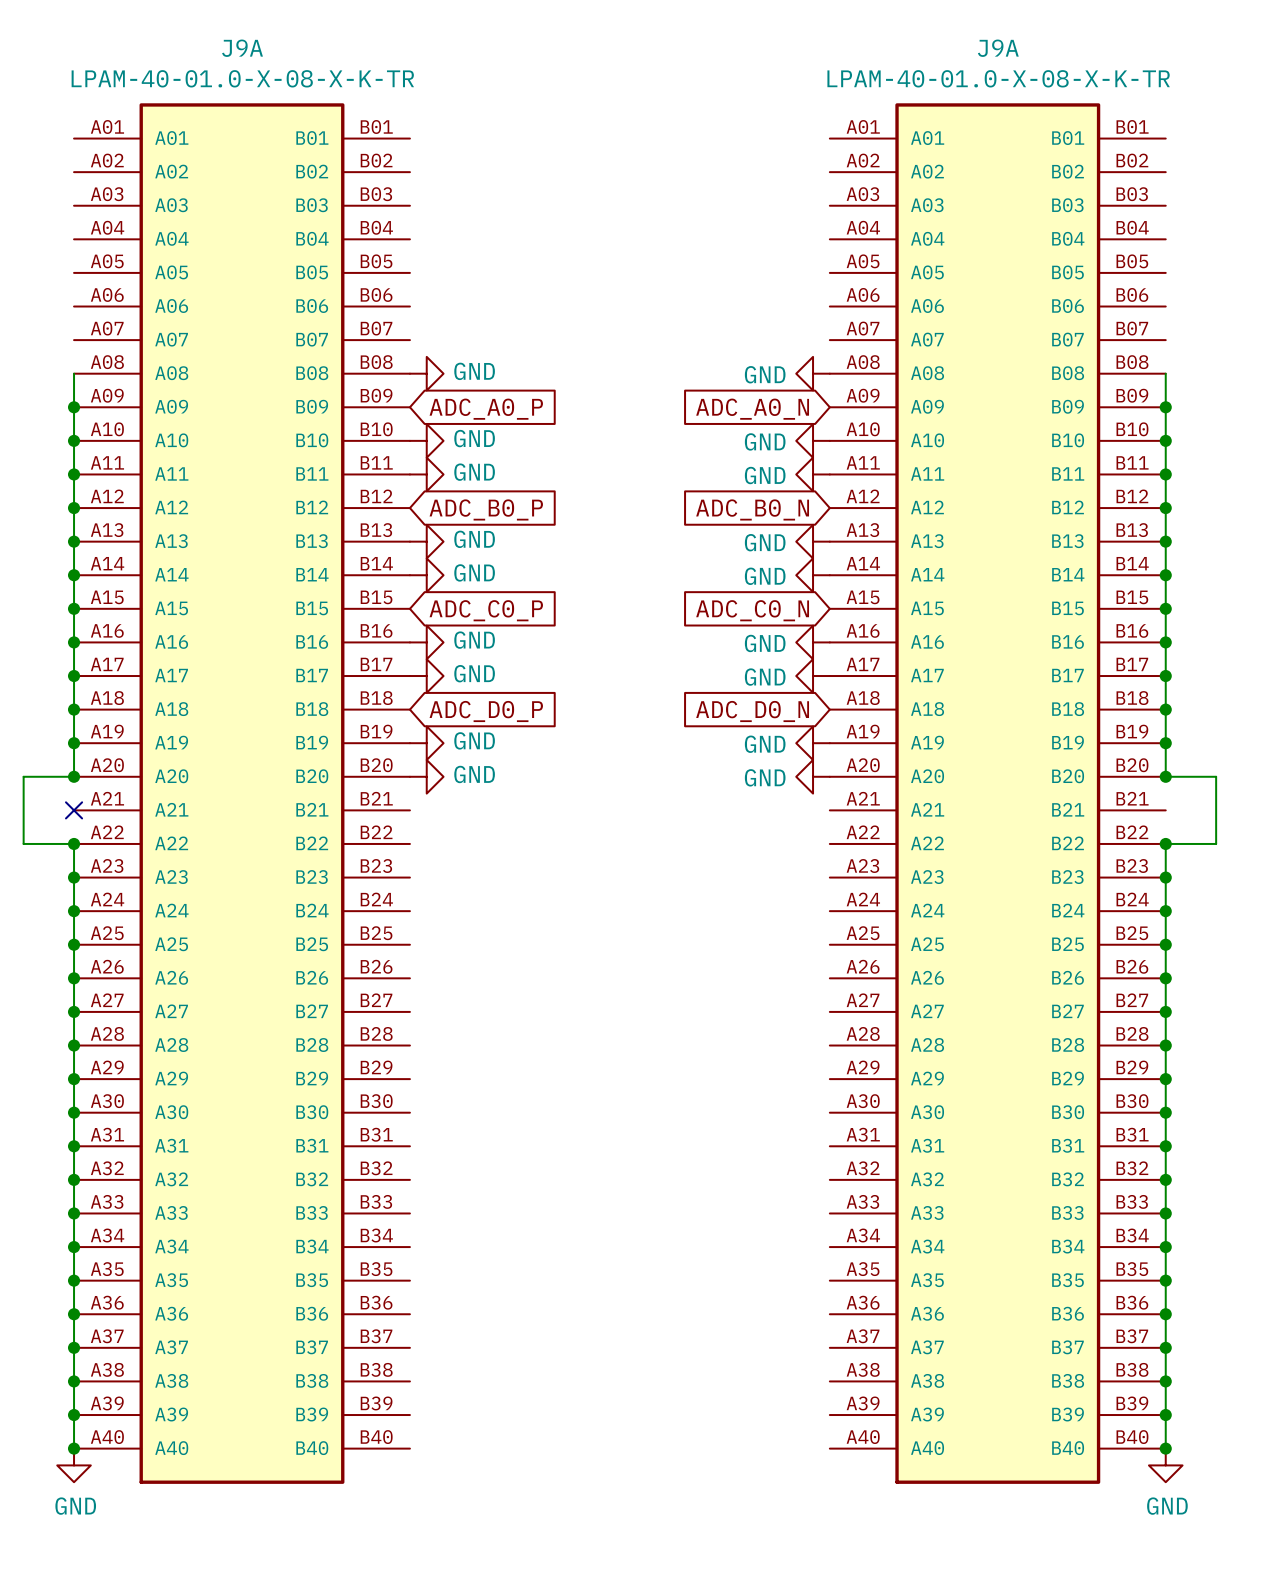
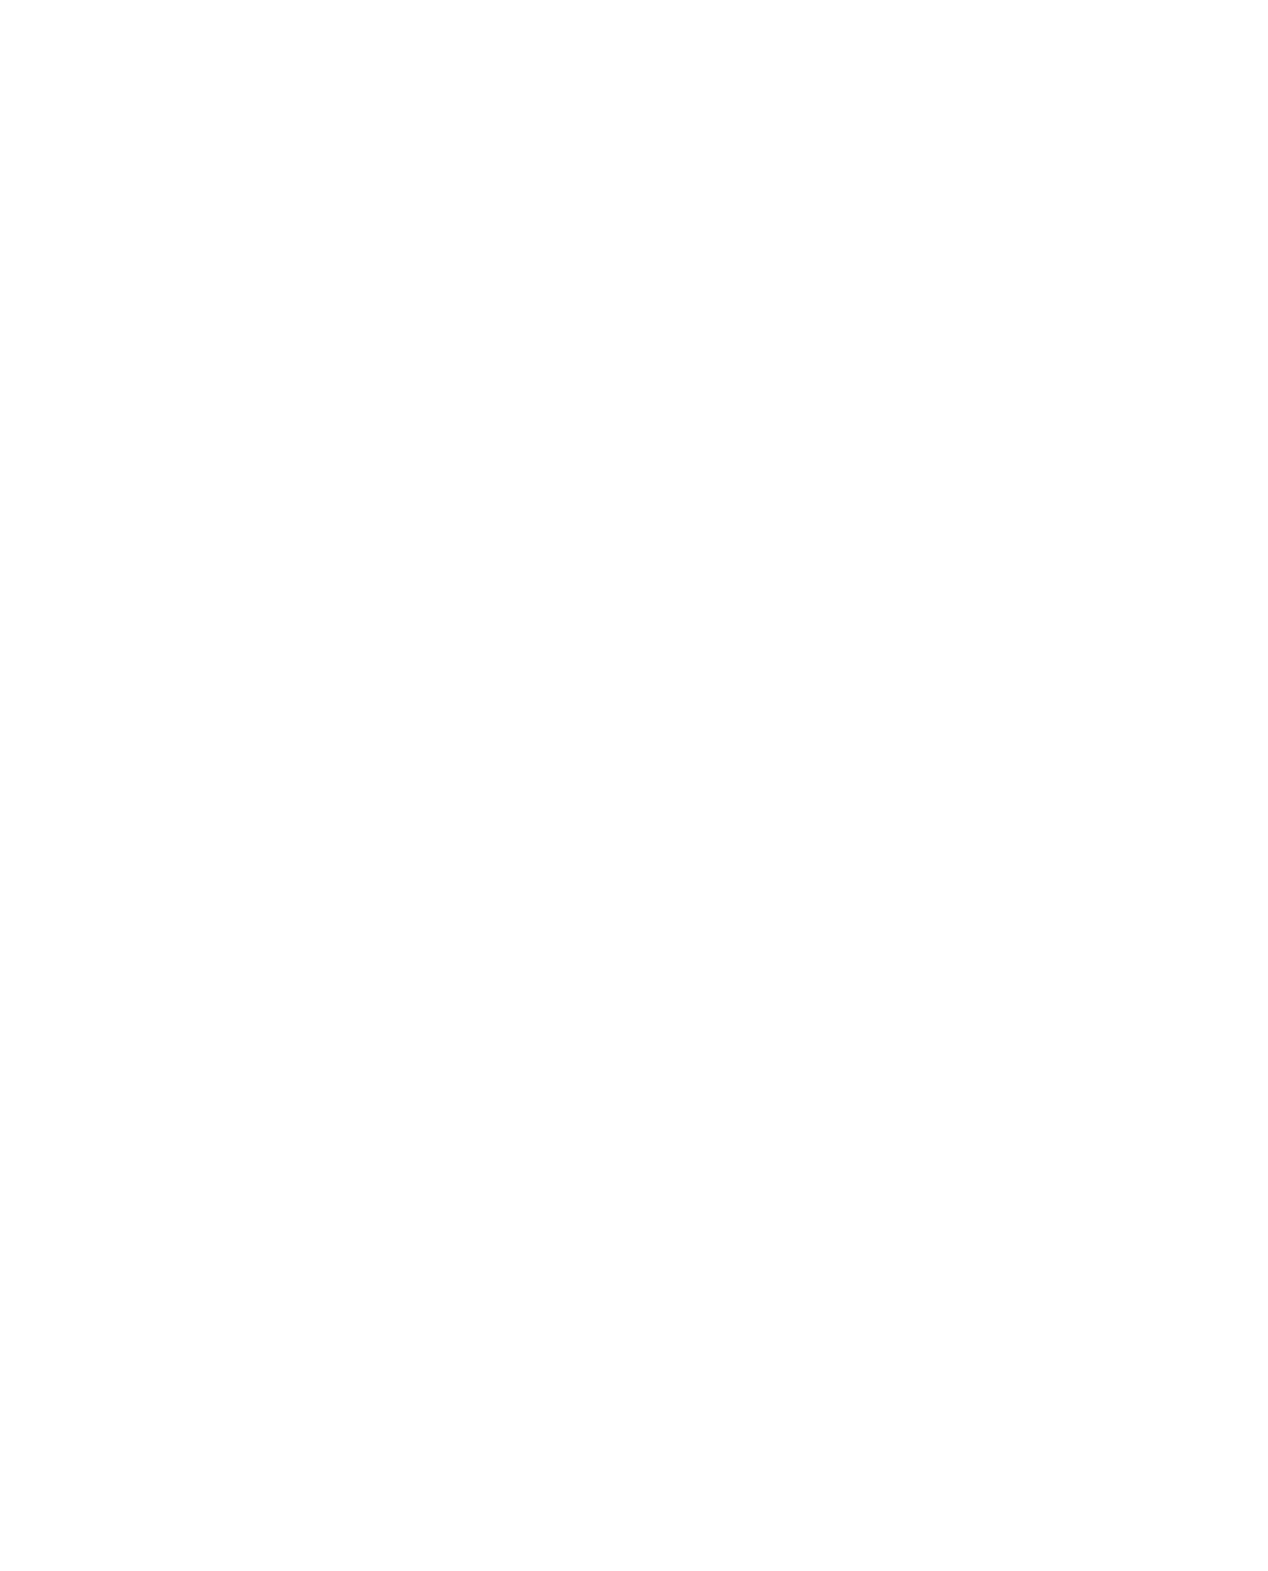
wire: (74, 373) (74, 776) (23, 776) (23, 843) (74, 843) (74, 1448) -> none
power symbol: GND (426, 373) -> none
power symbol: GND (813, 373) -> none
wire: (1165, 373) (1165, 776) (1216, 776) (1216, 843) (1165, 843) (1165, 1448) -> none
junction: (74, 407) -> none
junction: (1165, 407) -> none
global label: ADC_A0_P (486, 409) -> none
global label: ADC_A0_N (752, 409) -> none
junction: (74, 440) -> none
power symbol: GND (426, 440) -> none
power symbol: GND (813, 440) -> none
junction: (1165, 440) -> none
junction: (74, 474) -> none
power symbol: GND (426, 474) -> none
power symbol: GND (813, 474) -> none
junction: (1165, 474) -> none
junction: (74, 508) -> none
junction: (1165, 508) -> none
global label: ADC_B0_P (486, 509) -> none
global label: ADC_B0_N (752, 509) -> none
junction: (74, 541) -> none
power symbol: GND (426, 541) -> none
power symbol: GND (813, 541) -> none
junction: (1165, 541) -> none
junction: (74, 575) -> none
power symbol: GND (426, 575) -> none
power symbol: GND (813, 575) -> none
junction: (1165, 575) -> none
junction: (74, 608) -> none
junction: (1165, 608) -> none
global label: ADC_C0_P (486, 610) -> none
global label: ADC_C0_N (752, 610) -> none
junction: (74, 642) -> none
power symbol: GND (426, 642) -> none
power symbol: GND (813, 642) -> none
junction: (1165, 642) -> none
junction: (74, 676) -> none
power symbol: GND (426, 676) -> none
power symbol: GND (813, 676) -> none
junction: (1165, 676) -> none
junction: (74, 709) -> none
junction: (1165, 709) -> none
global label: ADC_D0_P (486, 711) -> none
global label: ADC_D0_N (752, 711) -> none
junction: (74, 743) -> none
power symbol: GND (426, 743) -> none
power symbol: GND (813, 743) -> none
junction: (1165, 743) -> none
junction: (74, 776) -> none
power symbol: GND (426, 776) -> none
power symbol: GND (813, 776) -> none
junction: (1165, 776) -> none
J9A: LPAM-40-01.0-X-08-X-K-TR (241, 793) -> none
J9A: LPAM-40-01.0-X-08-X-K-TR (997, 793) -> none
no-connect mark: (74, 810) -> none
junction: (74, 843) -> none
junction: (1165, 843) -> none
junction: (74, 877) -> none
junction: (1165, 877) -> none
junction: (74, 911) -> none
junction: (1165, 911) -> none
junction: (74, 944) -> none
junction: (1165, 944) -> none
junction: (74, 978) -> none
junction: (1165, 978) -> none
junction: (74, 1011) -> none
junction: (1165, 1011) -> none
junction: (74, 1045) -> none
junction: (1165, 1045) -> none
junction: (74, 1079) -> none
junction: (1165, 1079) -> none
junction: (74, 1112) -> none
junction: (1165, 1112) -> none
junction: (74, 1146) -> none
junction: (1165, 1146) -> none
junction: (74, 1179) -> none
junction: (1165, 1179) -> none
junction: (74, 1213) -> none
junction: (1165, 1213) -> none
junction: (74, 1247) -> none
junction: (1165, 1247) -> none
junction: (74, 1280) -> none
junction: (1165, 1280) -> none
junction: (74, 1314) -> none
junction: (1165, 1314) -> none
junction: (74, 1347) -> none
junction: (1165, 1347) -> none
junction: (74, 1381) -> none
junction: (1165, 1381) -> none
junction: (74, 1415) -> none
junction: (1165, 1415) -> none
junction: (74, 1448) -> none
junction: (1165, 1448) -> none
power symbol: GND (74, 1465) -> none
power symbol: GND (1165, 1465) -> none

